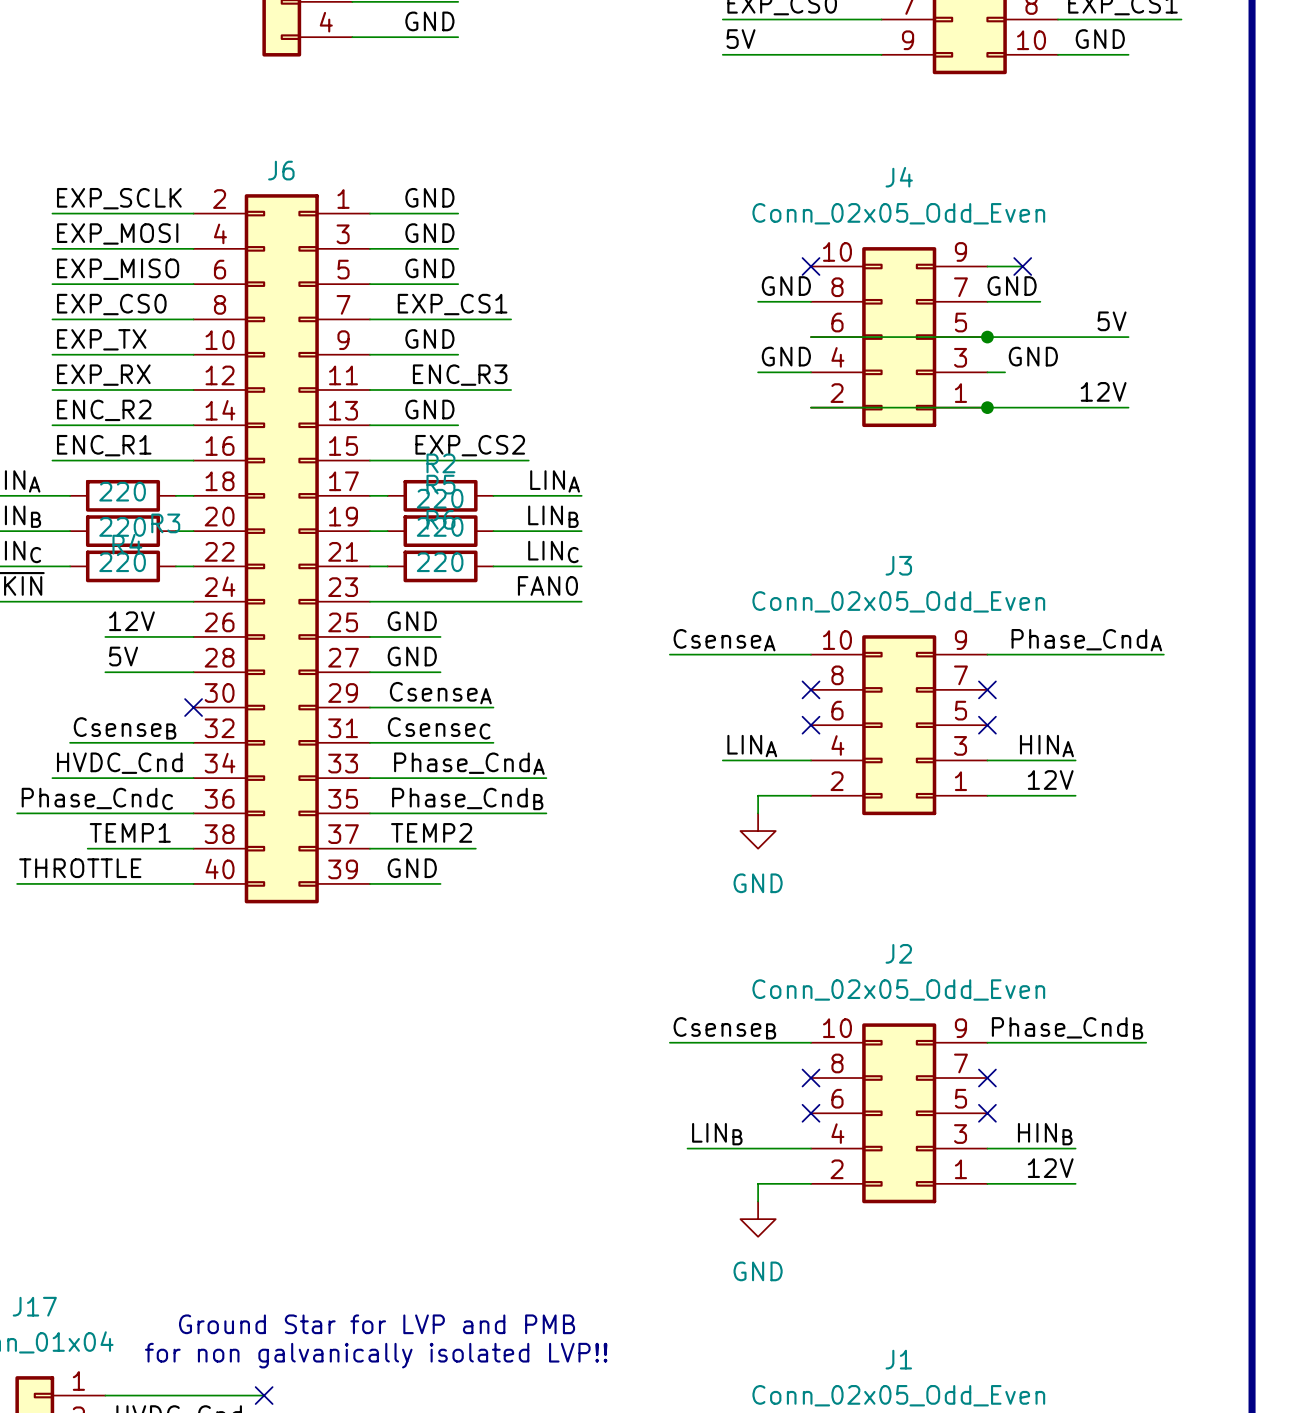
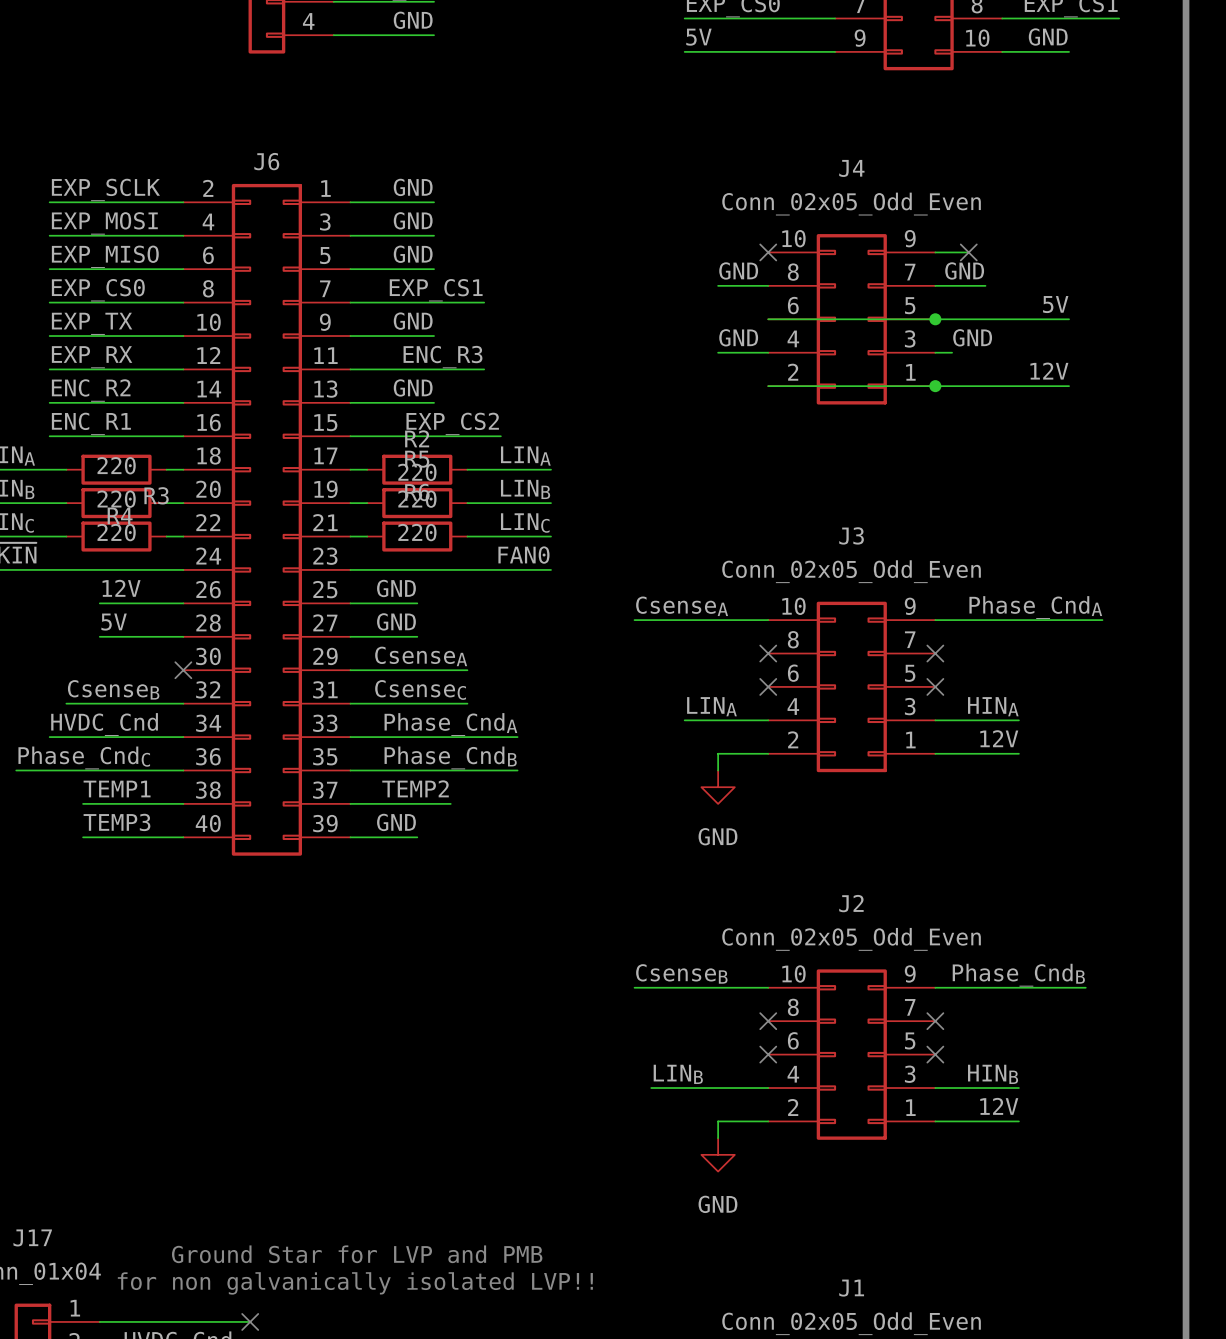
label: THROTTLE (80, 868) -> none
label: none -> TEMP3 (116, 822)
wire: (17, 883) (87, 883) -> none

